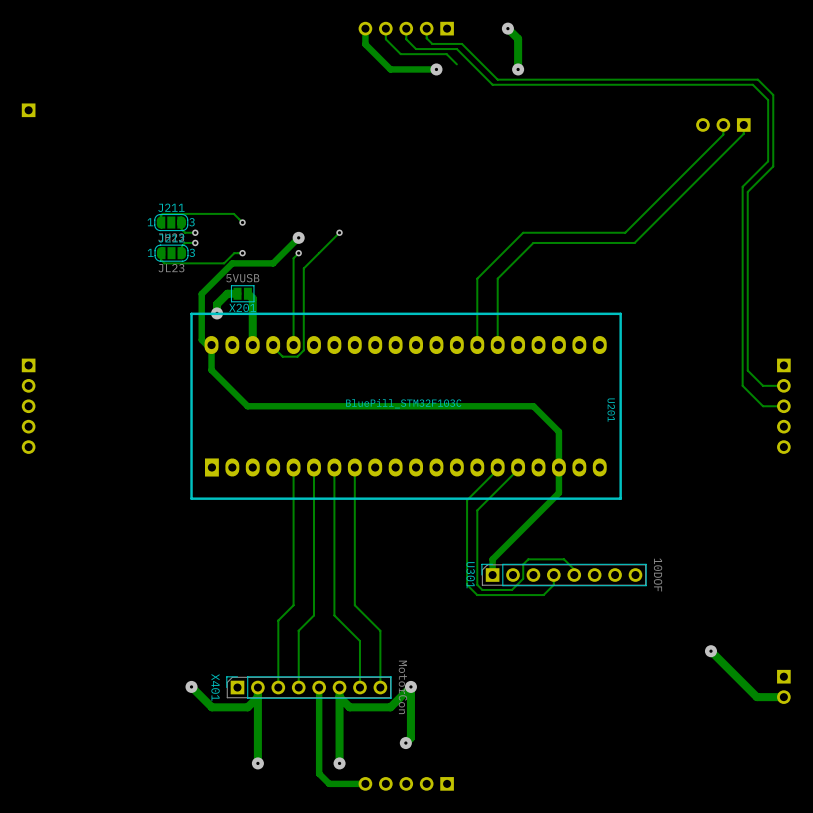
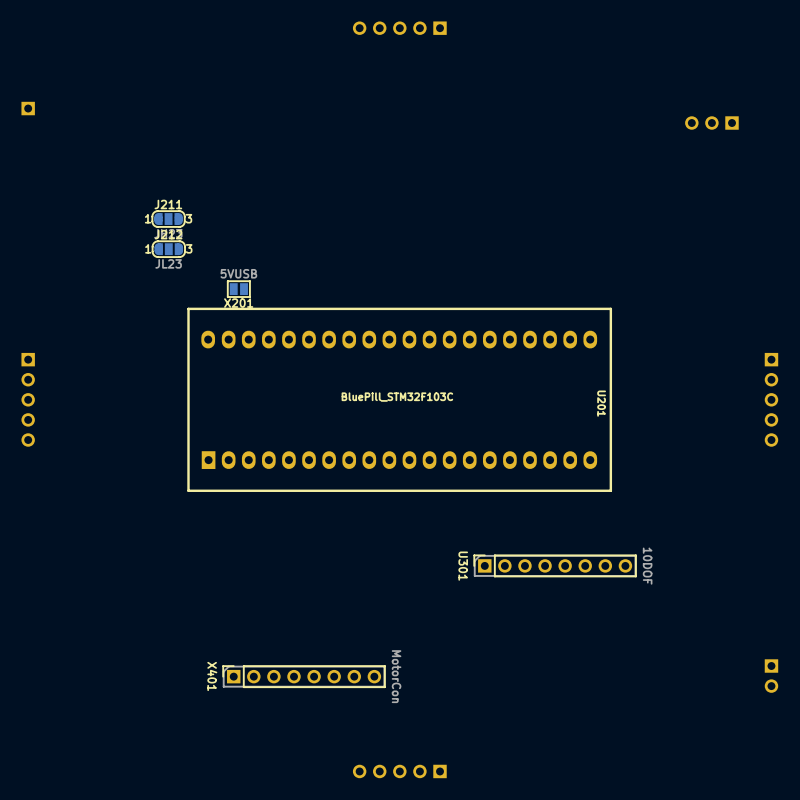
track: (365, 28) (365, 44) (390, 69) (436, 69) -> none
track: (385, 28) (385, 39) (400, 54) (446, 54) (456, 64) -> none
track: (406, 28) (406, 39) (416, 49) (456, 49) (492, 84) (752, 84) (768, 100) (768, 161) (742, 186) (742, 385) (763, 406) (783, 406) -> none
track: (426, 28) (426, 38) (432, 43) (461, 43) (497, 79) (757, 79) (773, 94) (773, 166) (747, 191) (747, 370) (763, 385) (783, 385) -> none
track: (507, 28) (518, 38) (518, 69) -> none
via: (507, 28) -> none
via: (436, 69) -> none
via: (518, 69) -> none
track: (723, 124) (723, 134) (625, 232) (523, 232) (477, 278) (477, 345) -> none
track: (743, 124) (743, 133) (634, 242) (533, 242) (497, 278) (497, 345) -> none
track: (181, 222) (181, 229) (185, 232) (195, 232) -> none
track: (242, 222) (233, 213) (162, 213) (160, 222) -> none
via: (242, 222) -> none
via: (195, 232) -> none
track: (339, 232) (303, 268) (303, 350) (297, 356) (282, 356) (273, 345) -> none
via: (339, 232) -> none
track: (298, 237) (273, 263) (232, 263) (201, 293) (201, 339) (206, 345) (211, 345) (211, 370) (247, 406) (533, 406) (558, 431) (558, 493) (492, 559) (492, 575) -> none
via: (298, 237) -> none
track: (195, 242) (185, 242) (181, 246) (181, 253) -> none
via: (195, 242) -> none
track: (242, 253) (234, 253) (224, 263) (164, 263) (161, 259) (161, 253) -> none
via: (242, 253) -> none
track: (298, 253) (293, 258) (293, 345) -> none
via: (298, 253) -> none
track: (237, 293) (227, 293) (217, 304) (217, 313) -> none
track: (247, 293) (252, 298) (252, 345) -> none
via: (217, 313) -> none
track: (293, 467) (293, 605) (278, 620) -> none
track: (313, 467) (313, 615) (298, 630) -> none
track: (334, 467) (334, 615) (359, 641) (359, 687) -> none
track: (354, 467) (354, 605) (380, 630) (380, 687) -> none
track: (497, 467) (467, 500) (467, 584) (477, 595) (543, 595) (553, 584) (553, 575) -> none
track: (518, 467) (477, 510) (477, 584) (482, 589) (512, 589) (523, 578) (523, 564) (528, 559) (564, 559) (574, 569) (574, 575) -> none
track: (278, 620) (278, 687) -> none
track: (298, 630) (298, 687) -> none
track: (710, 651) (756, 697) (783, 697) -> none
via: (710, 651) -> none
track: (191, 686) (211, 707) (247, 707) (257, 697) -> none
via: (191, 686) -> none
via: (410, 686) -> none
track: (257, 687) (257, 763) -> none
track: (319, 687) (319, 773) -> none
track: (339, 687) (339, 763) -> none
track: (339, 697) (349, 707) (390, 707) (410, 686) (410, 737) (405, 743) -> none
via: (405, 743) -> none
via: (257, 763) -> none
via: (339, 763) -> none
track: (319, 773) (329, 783) (365, 783) -> none

